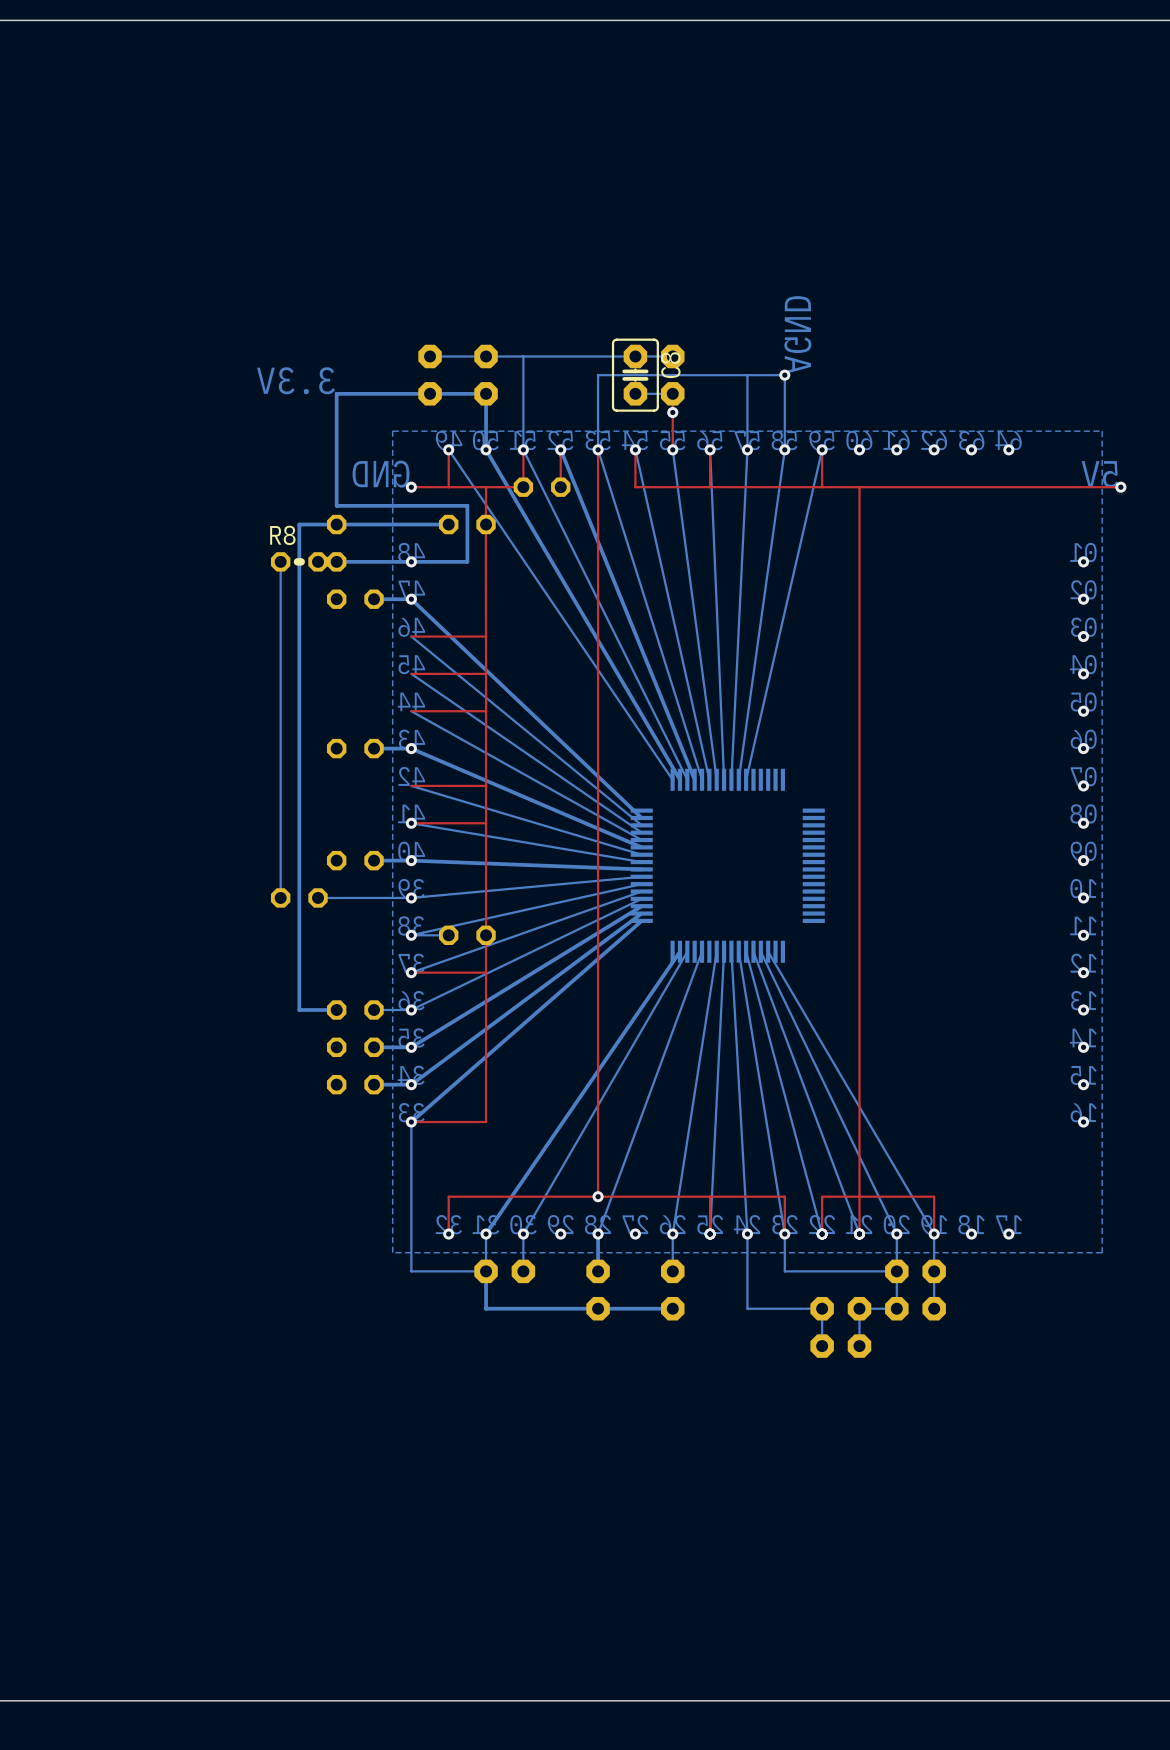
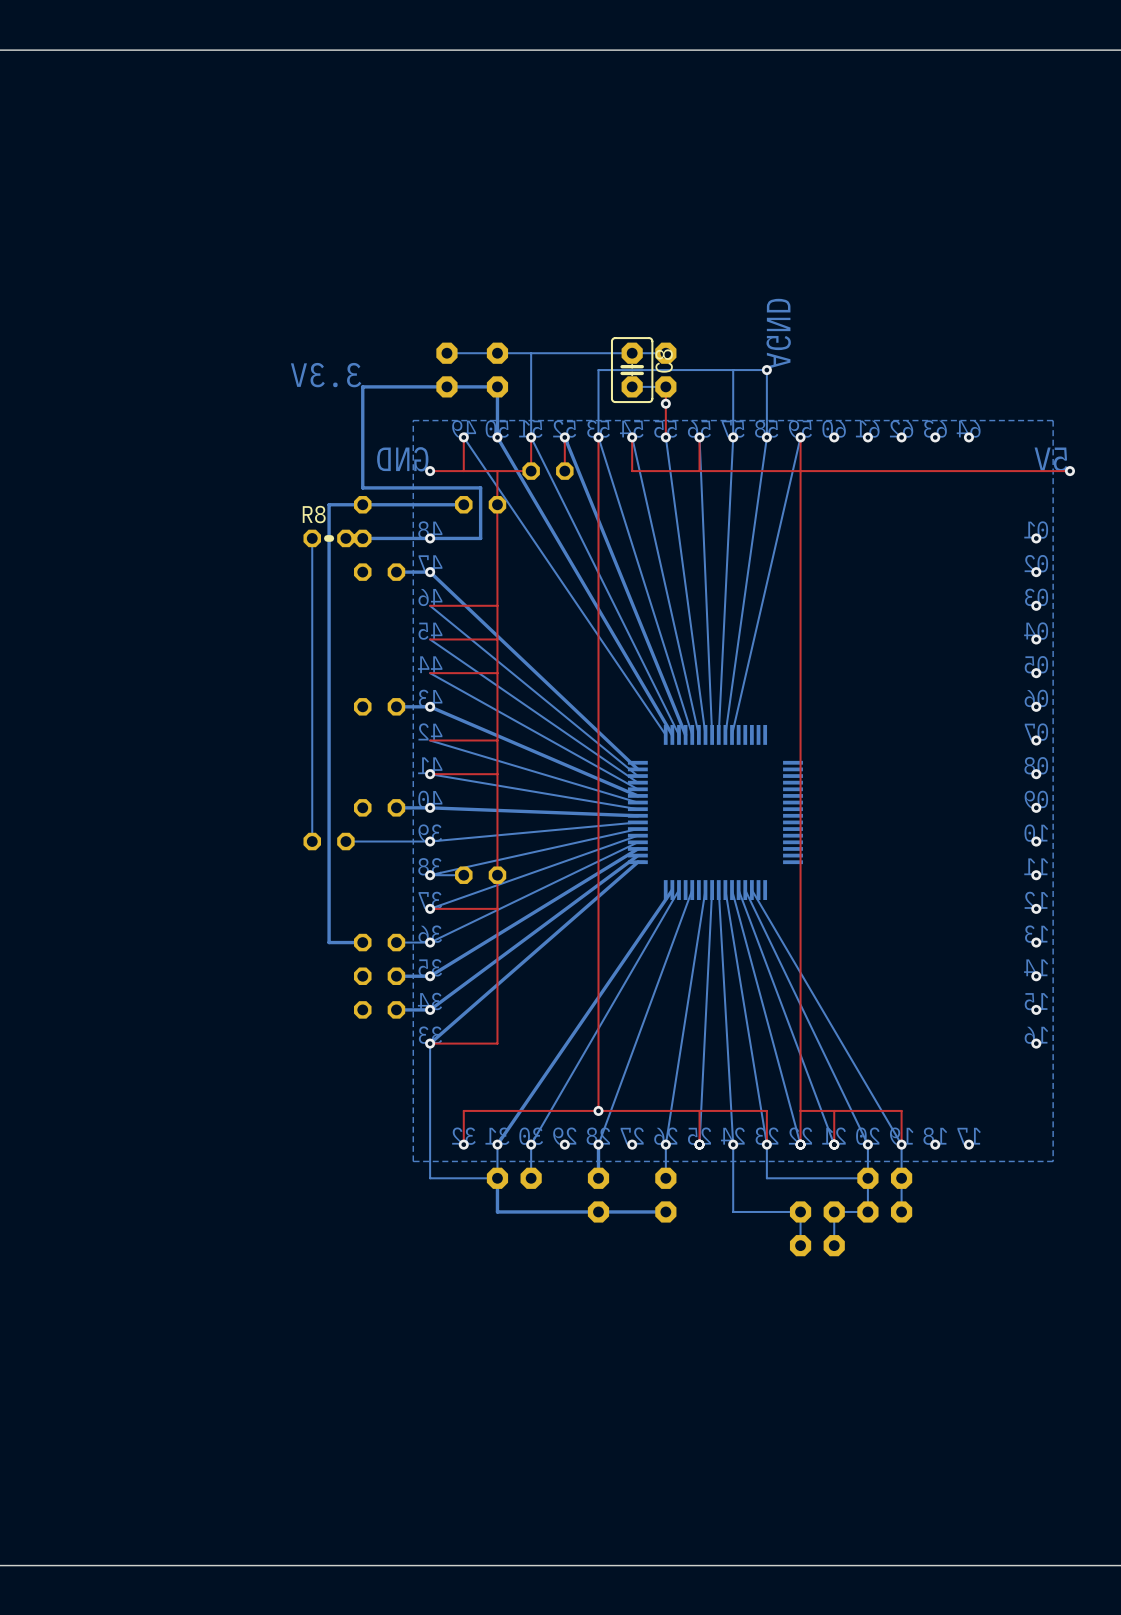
top track: (859, 487) (859, 1196) -> (800, 471) (800, 1110)

